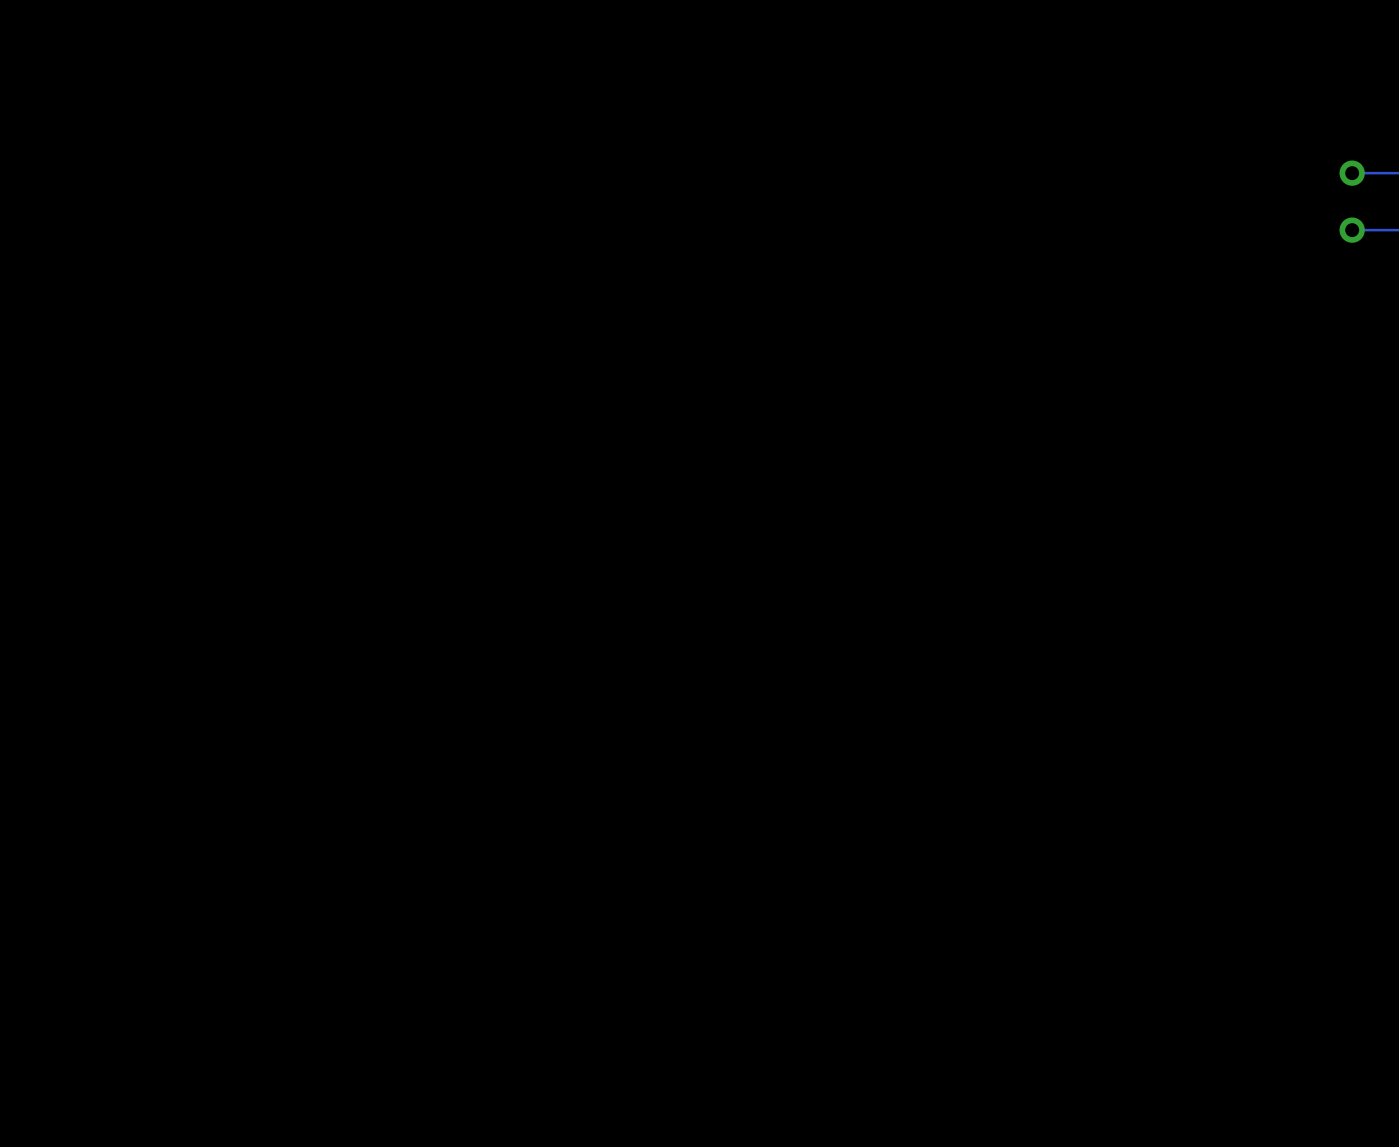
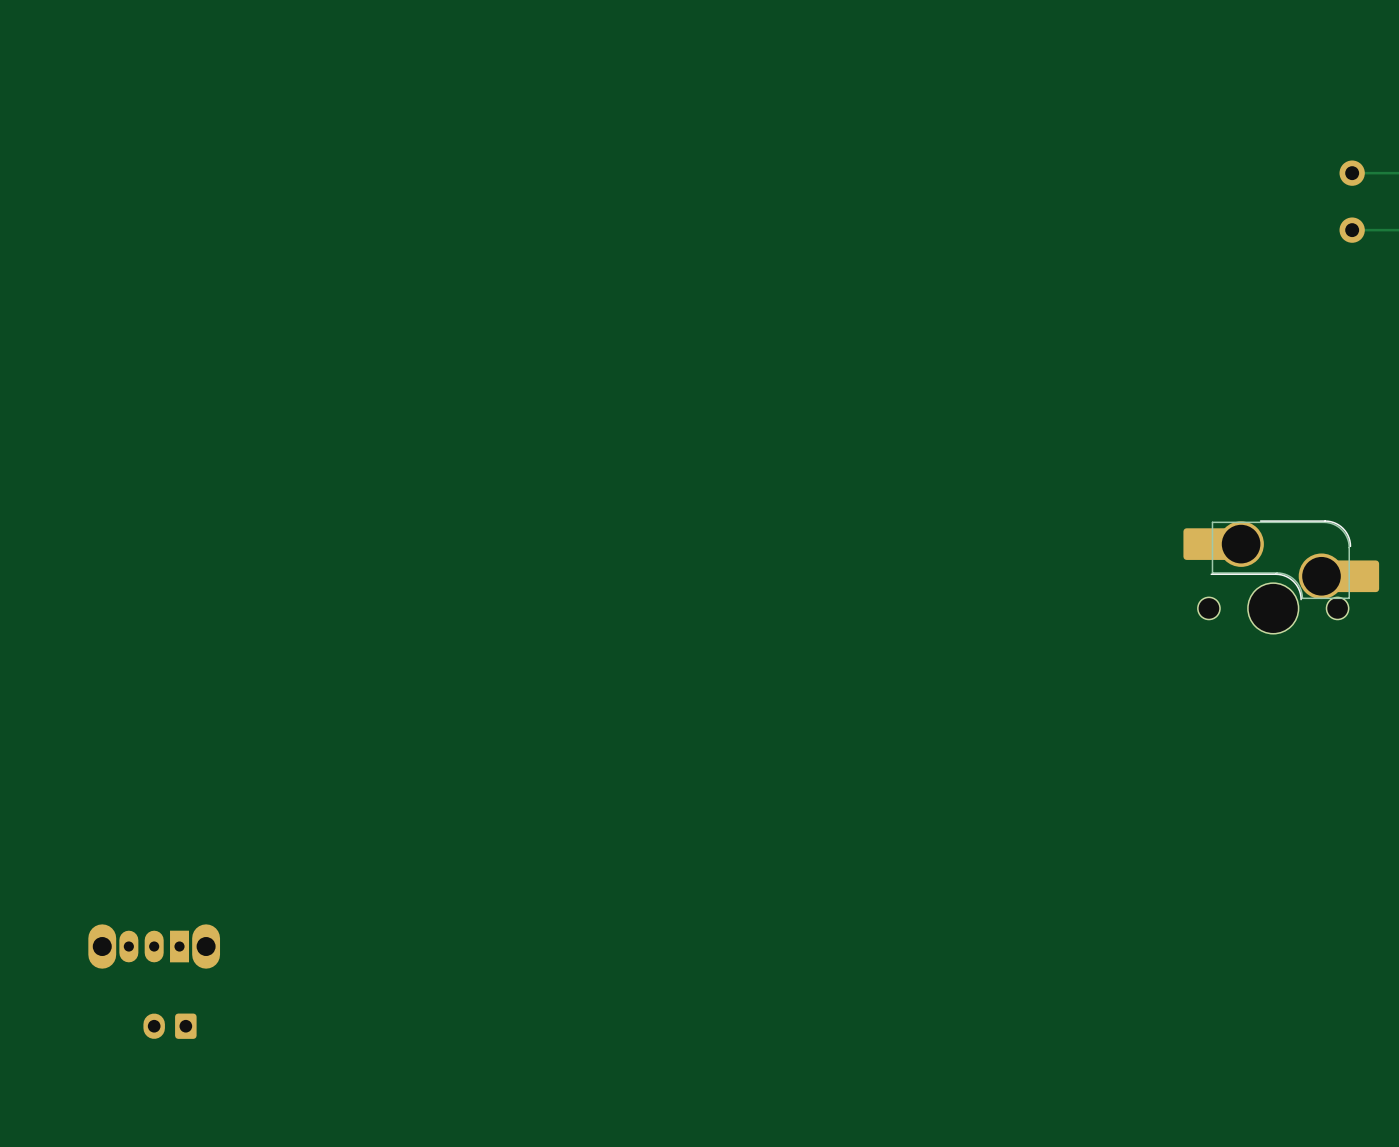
part: none -> (1281, 577)
part: none -> (154, 946)
part: none -> (170, 1026)

